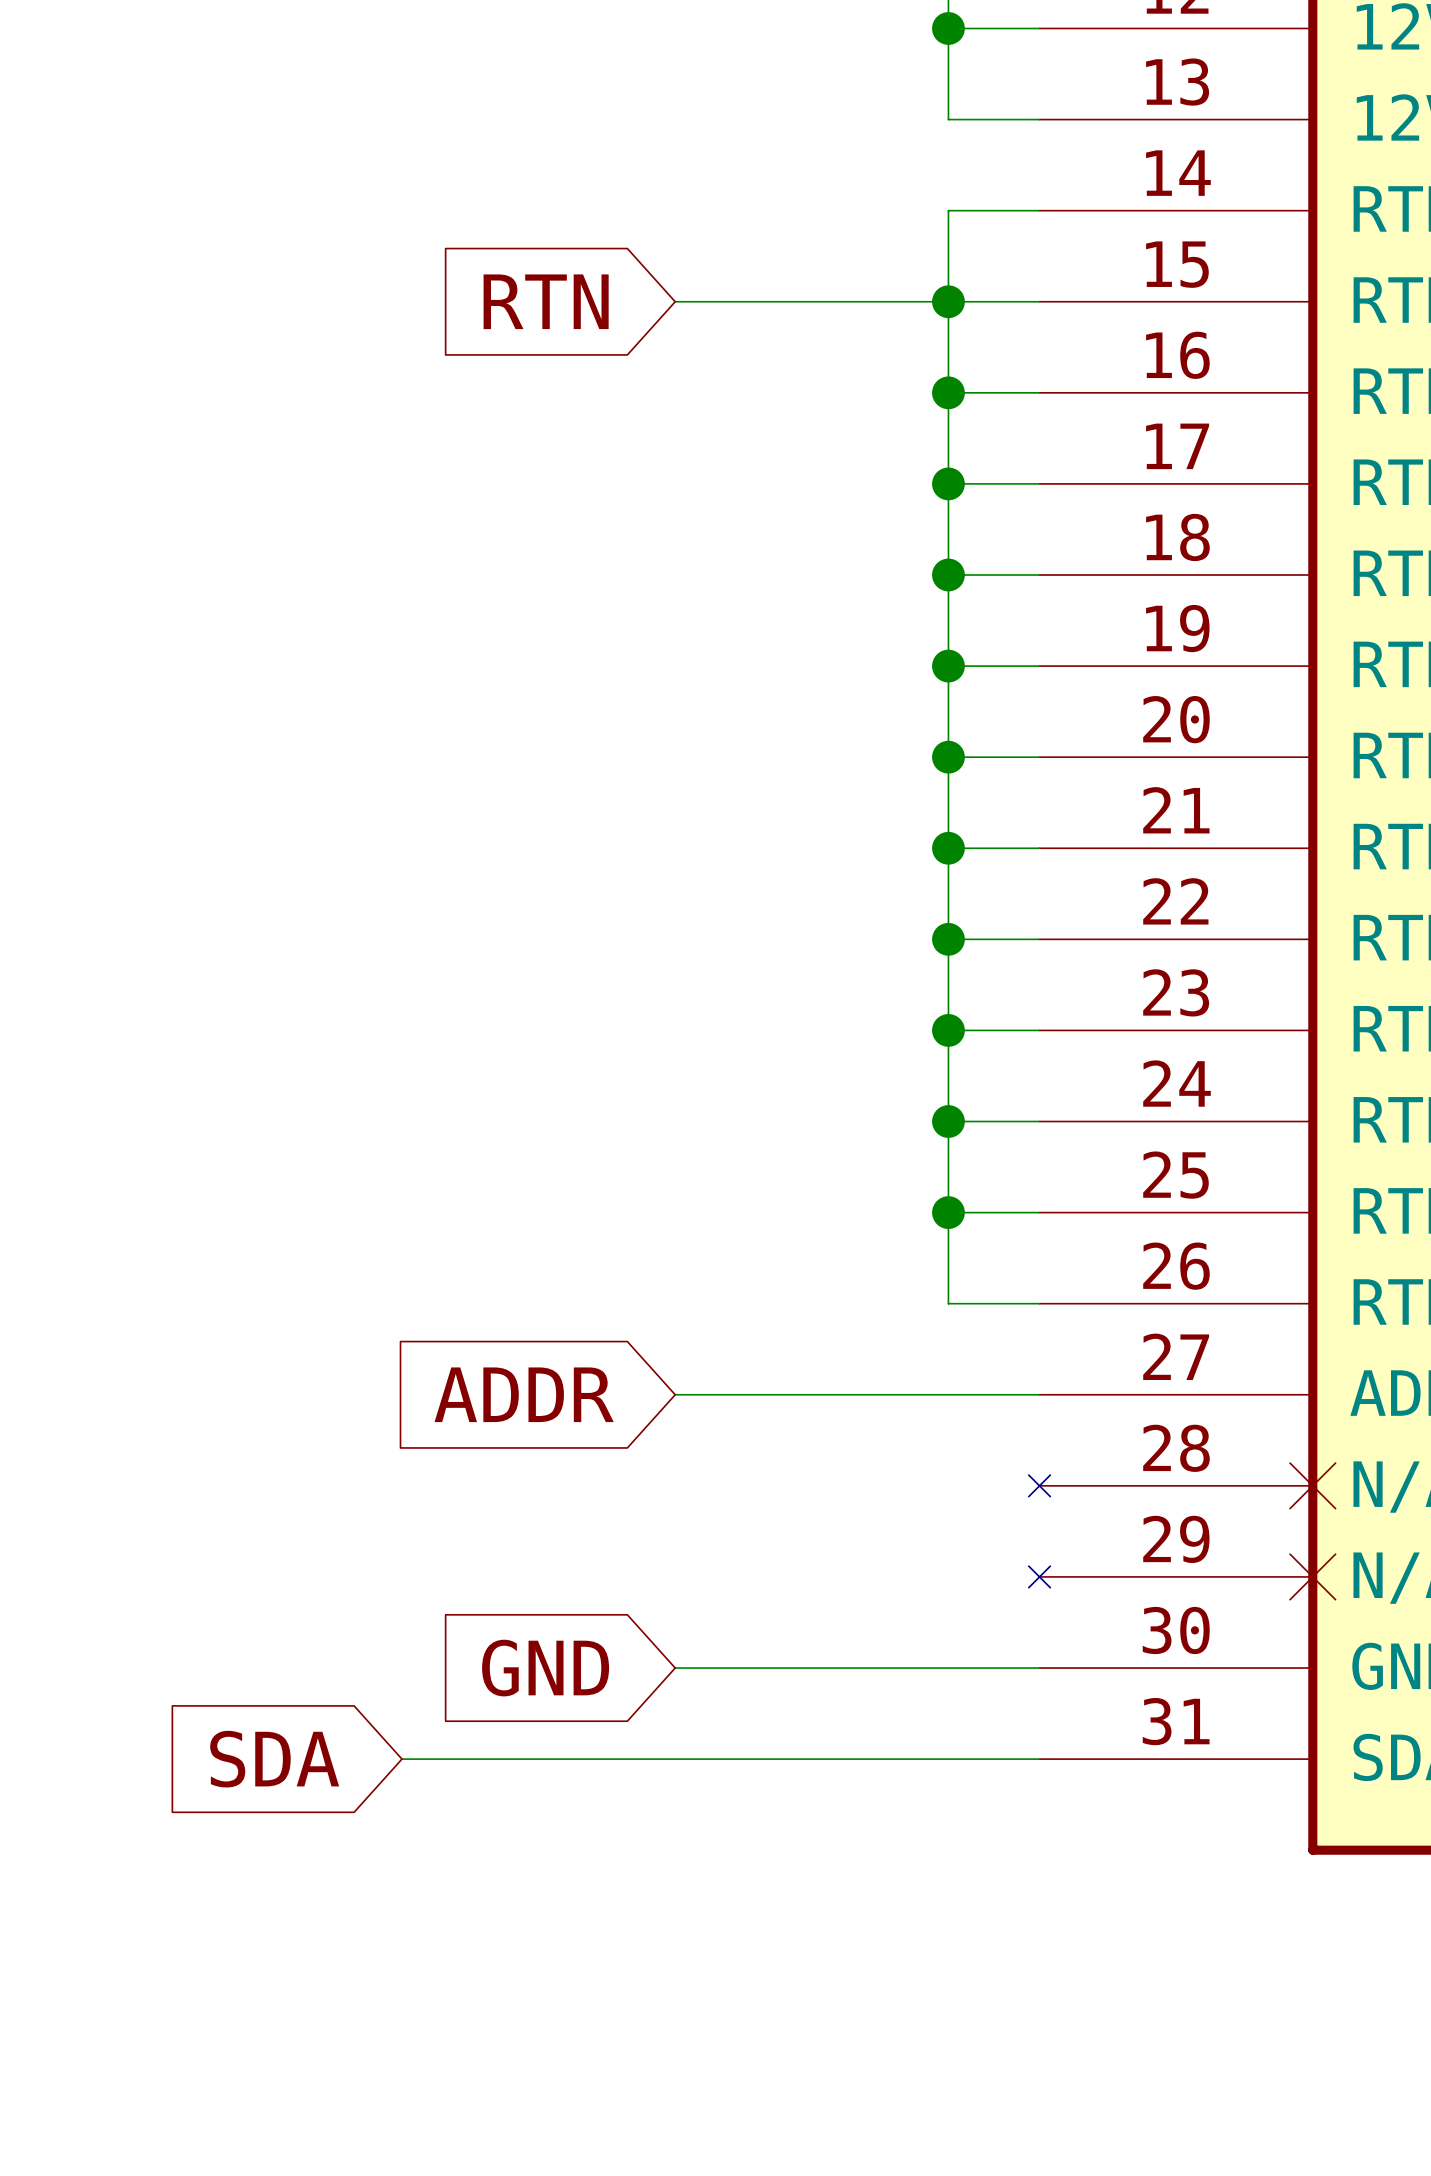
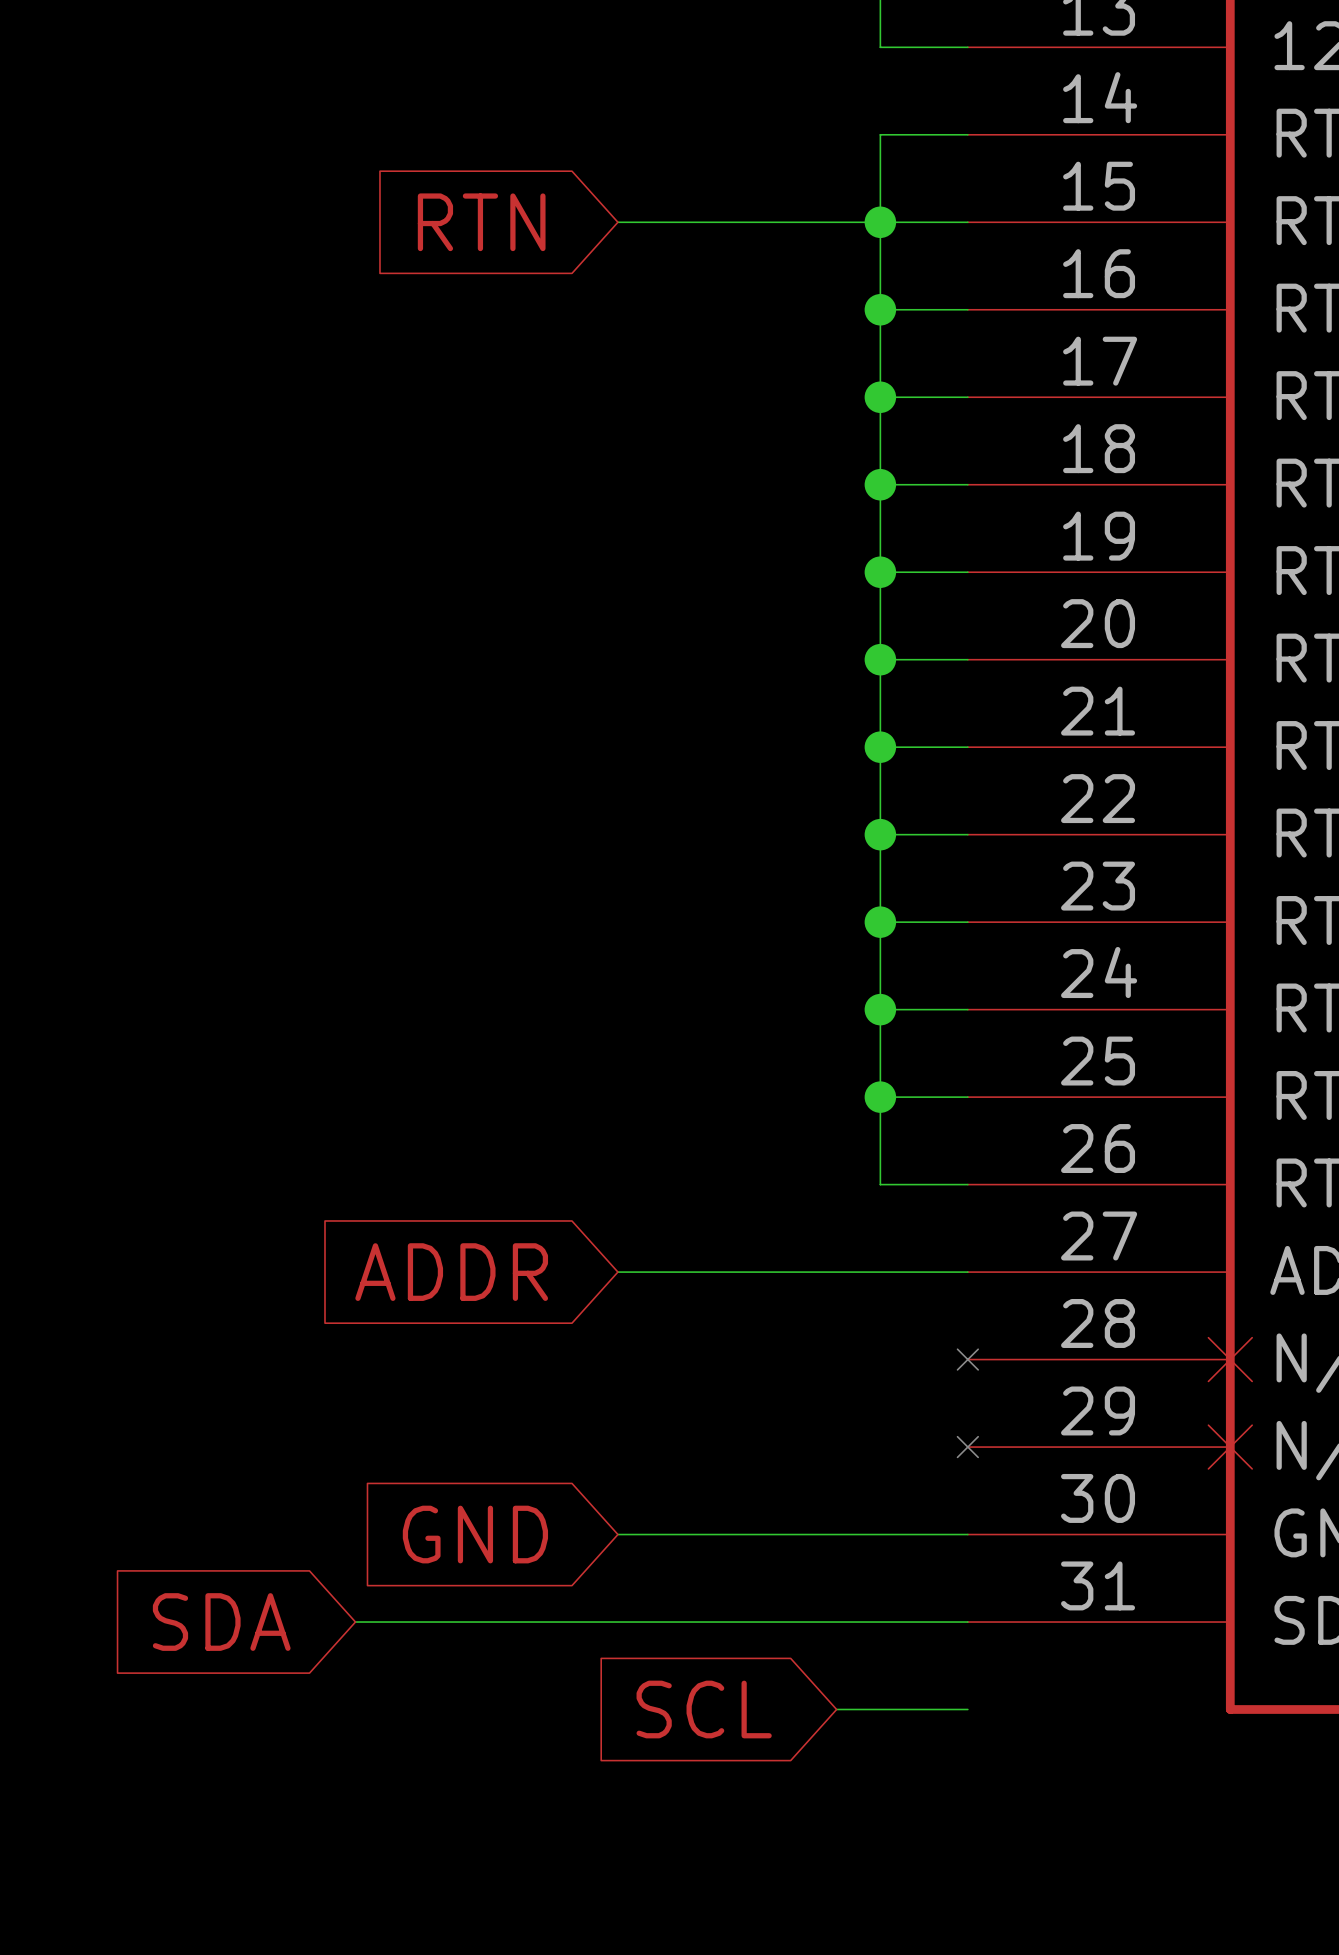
global label: none -> SCL (704, 1709)
wire: none -> (836, 1709) (967, 1709)

